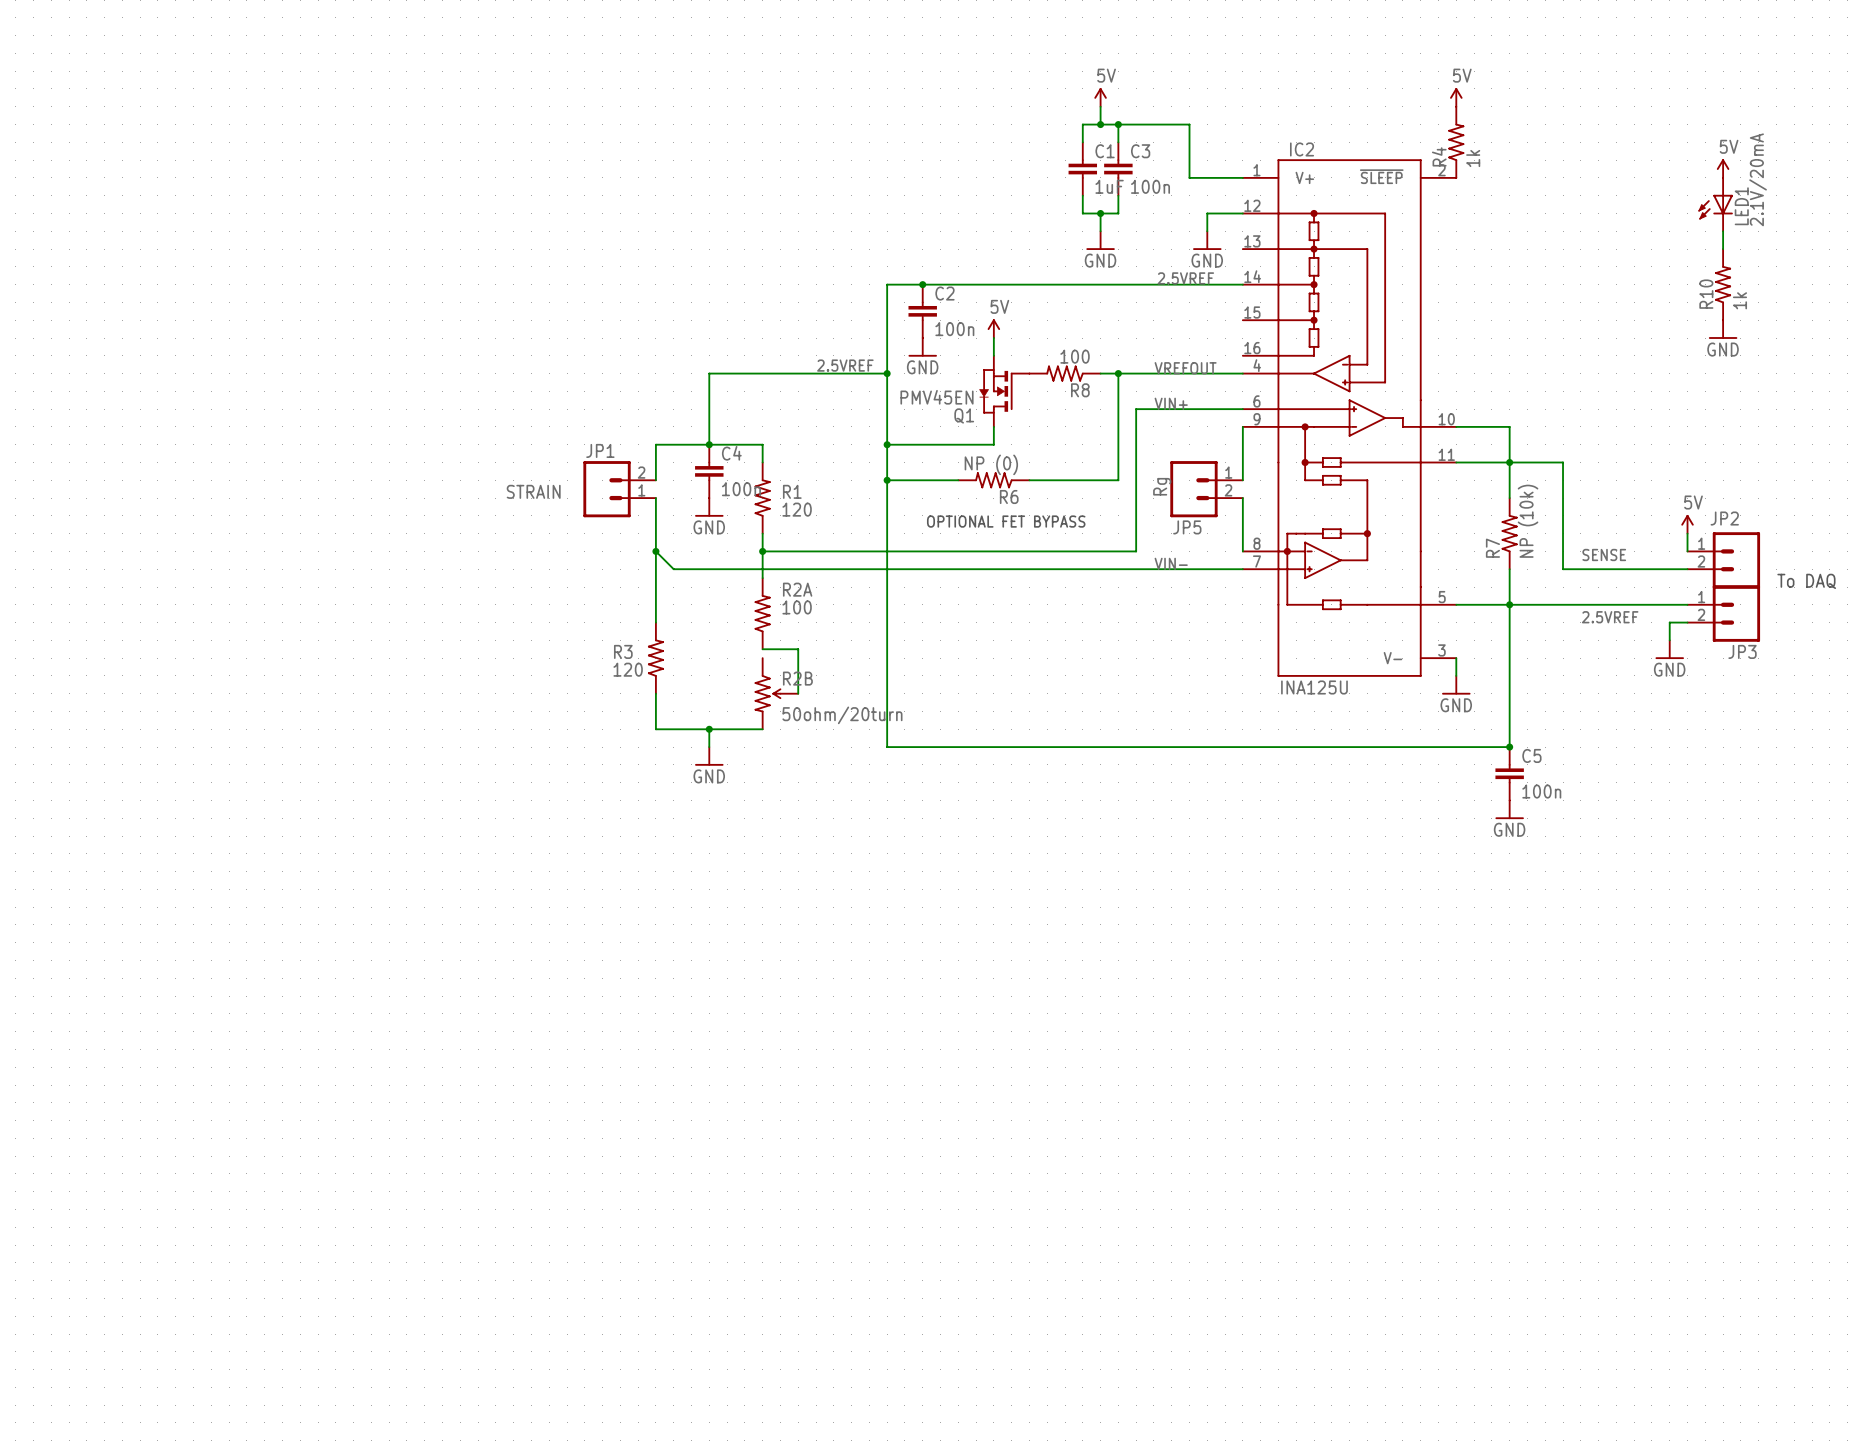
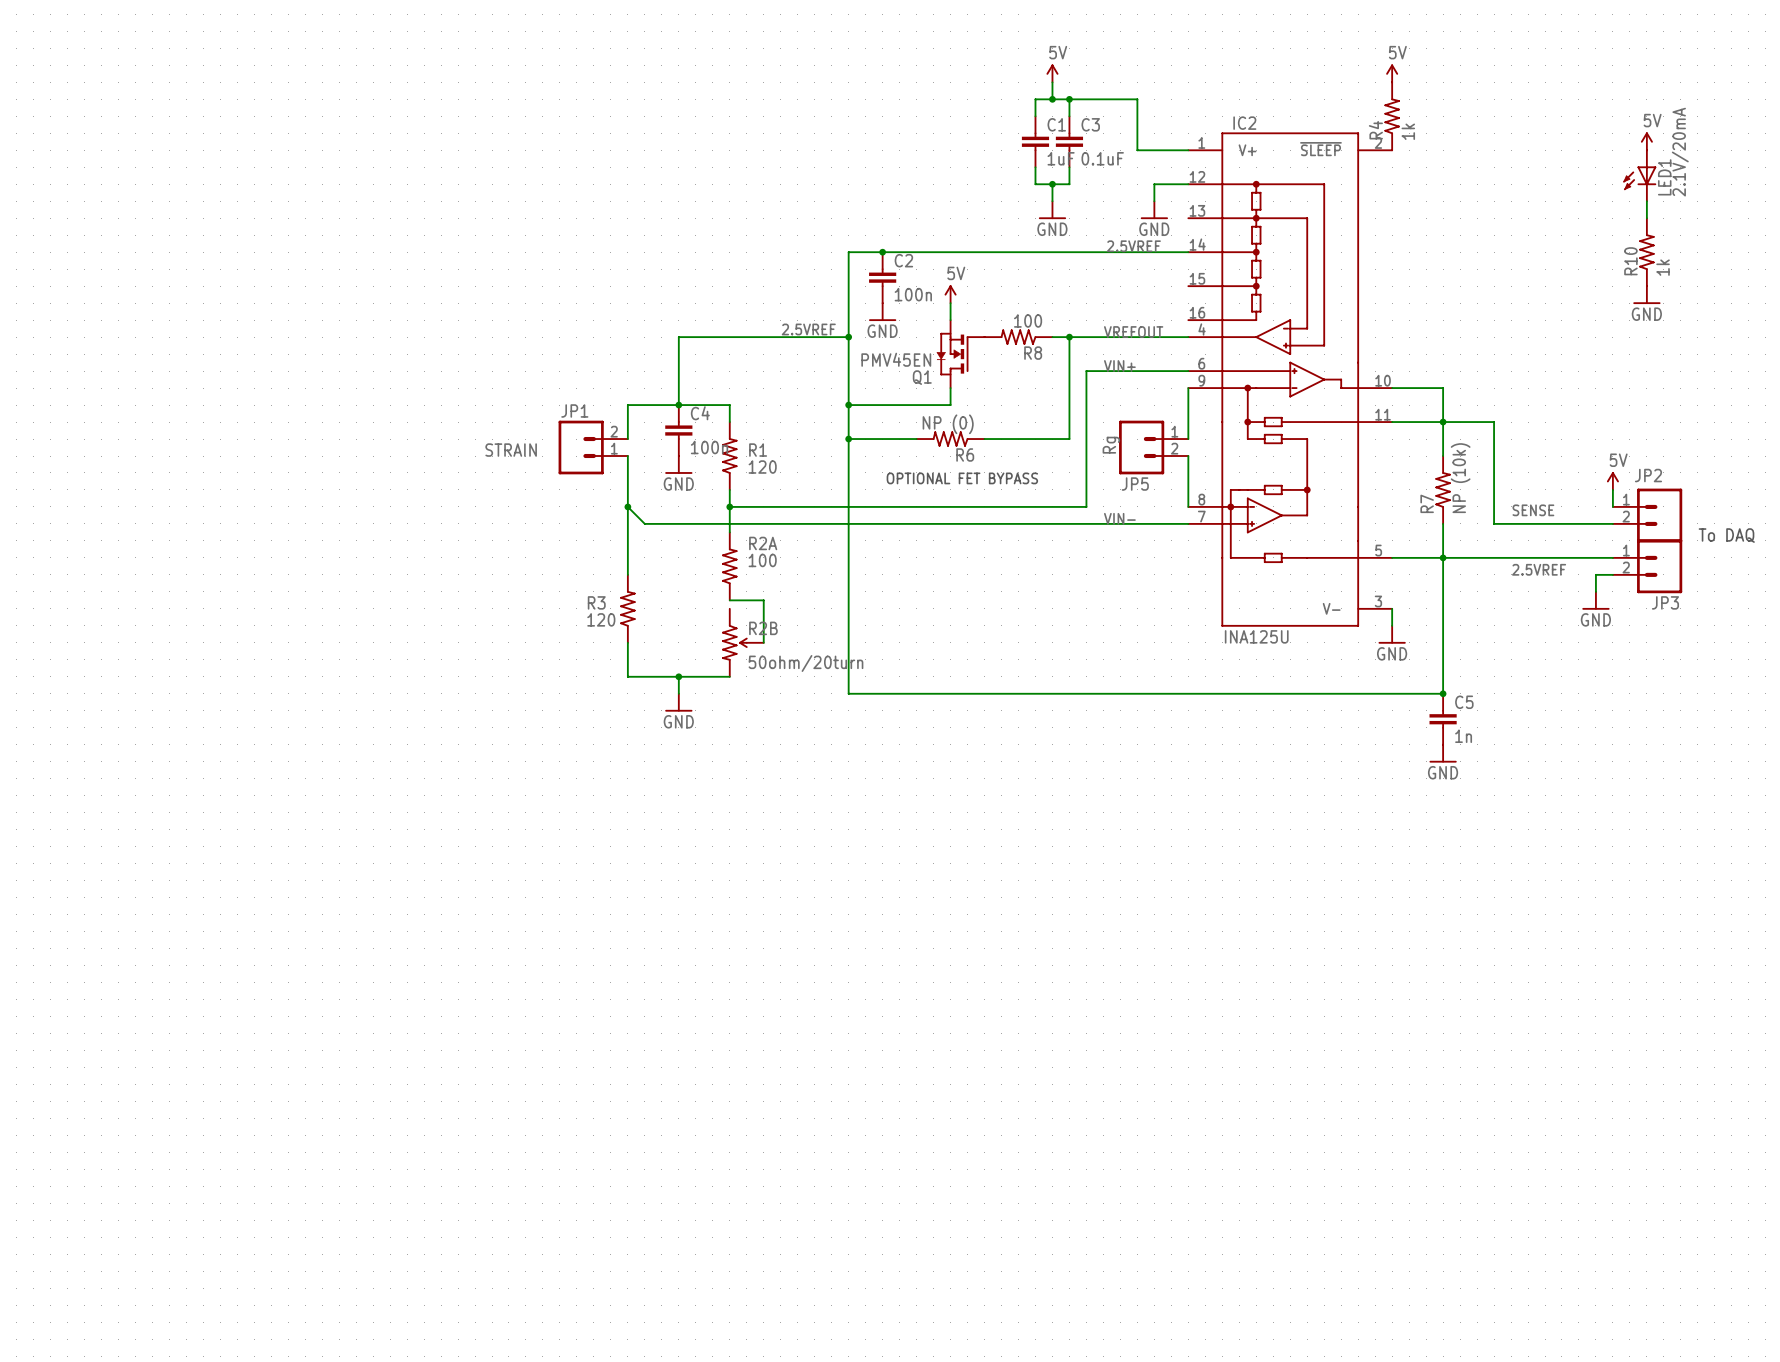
C3 value: 100n (1150, 186) -> 0.1uF (1102, 158)
C5 value: 100n (1541, 791) -> 1n (1463, 736)

